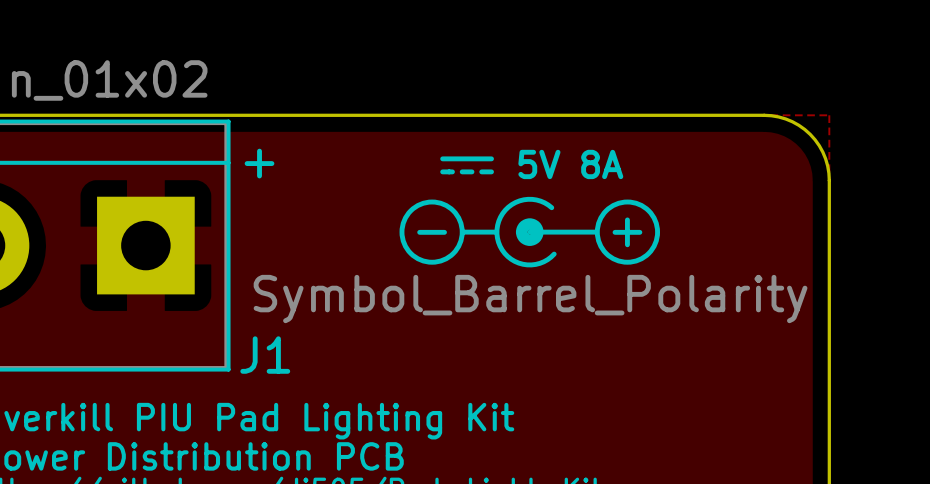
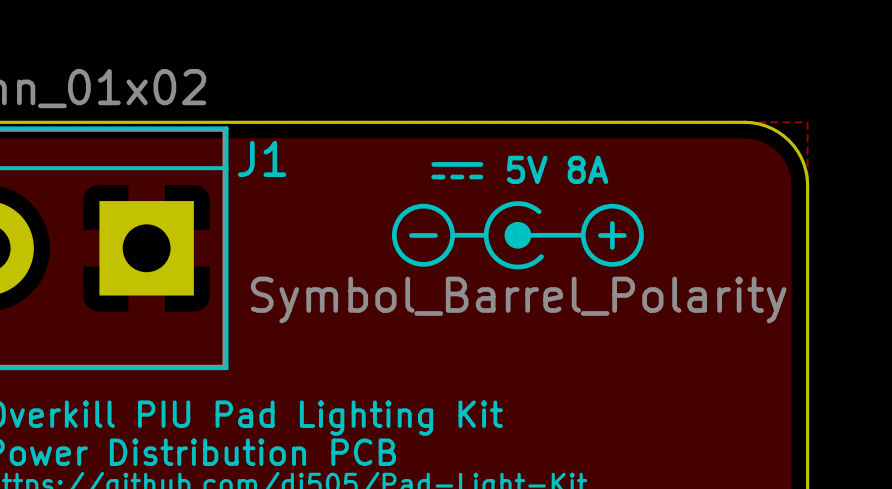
text: + (259, 163) -> none
J1 name position: J1 (265, 355) -> J1 (262, 158)

